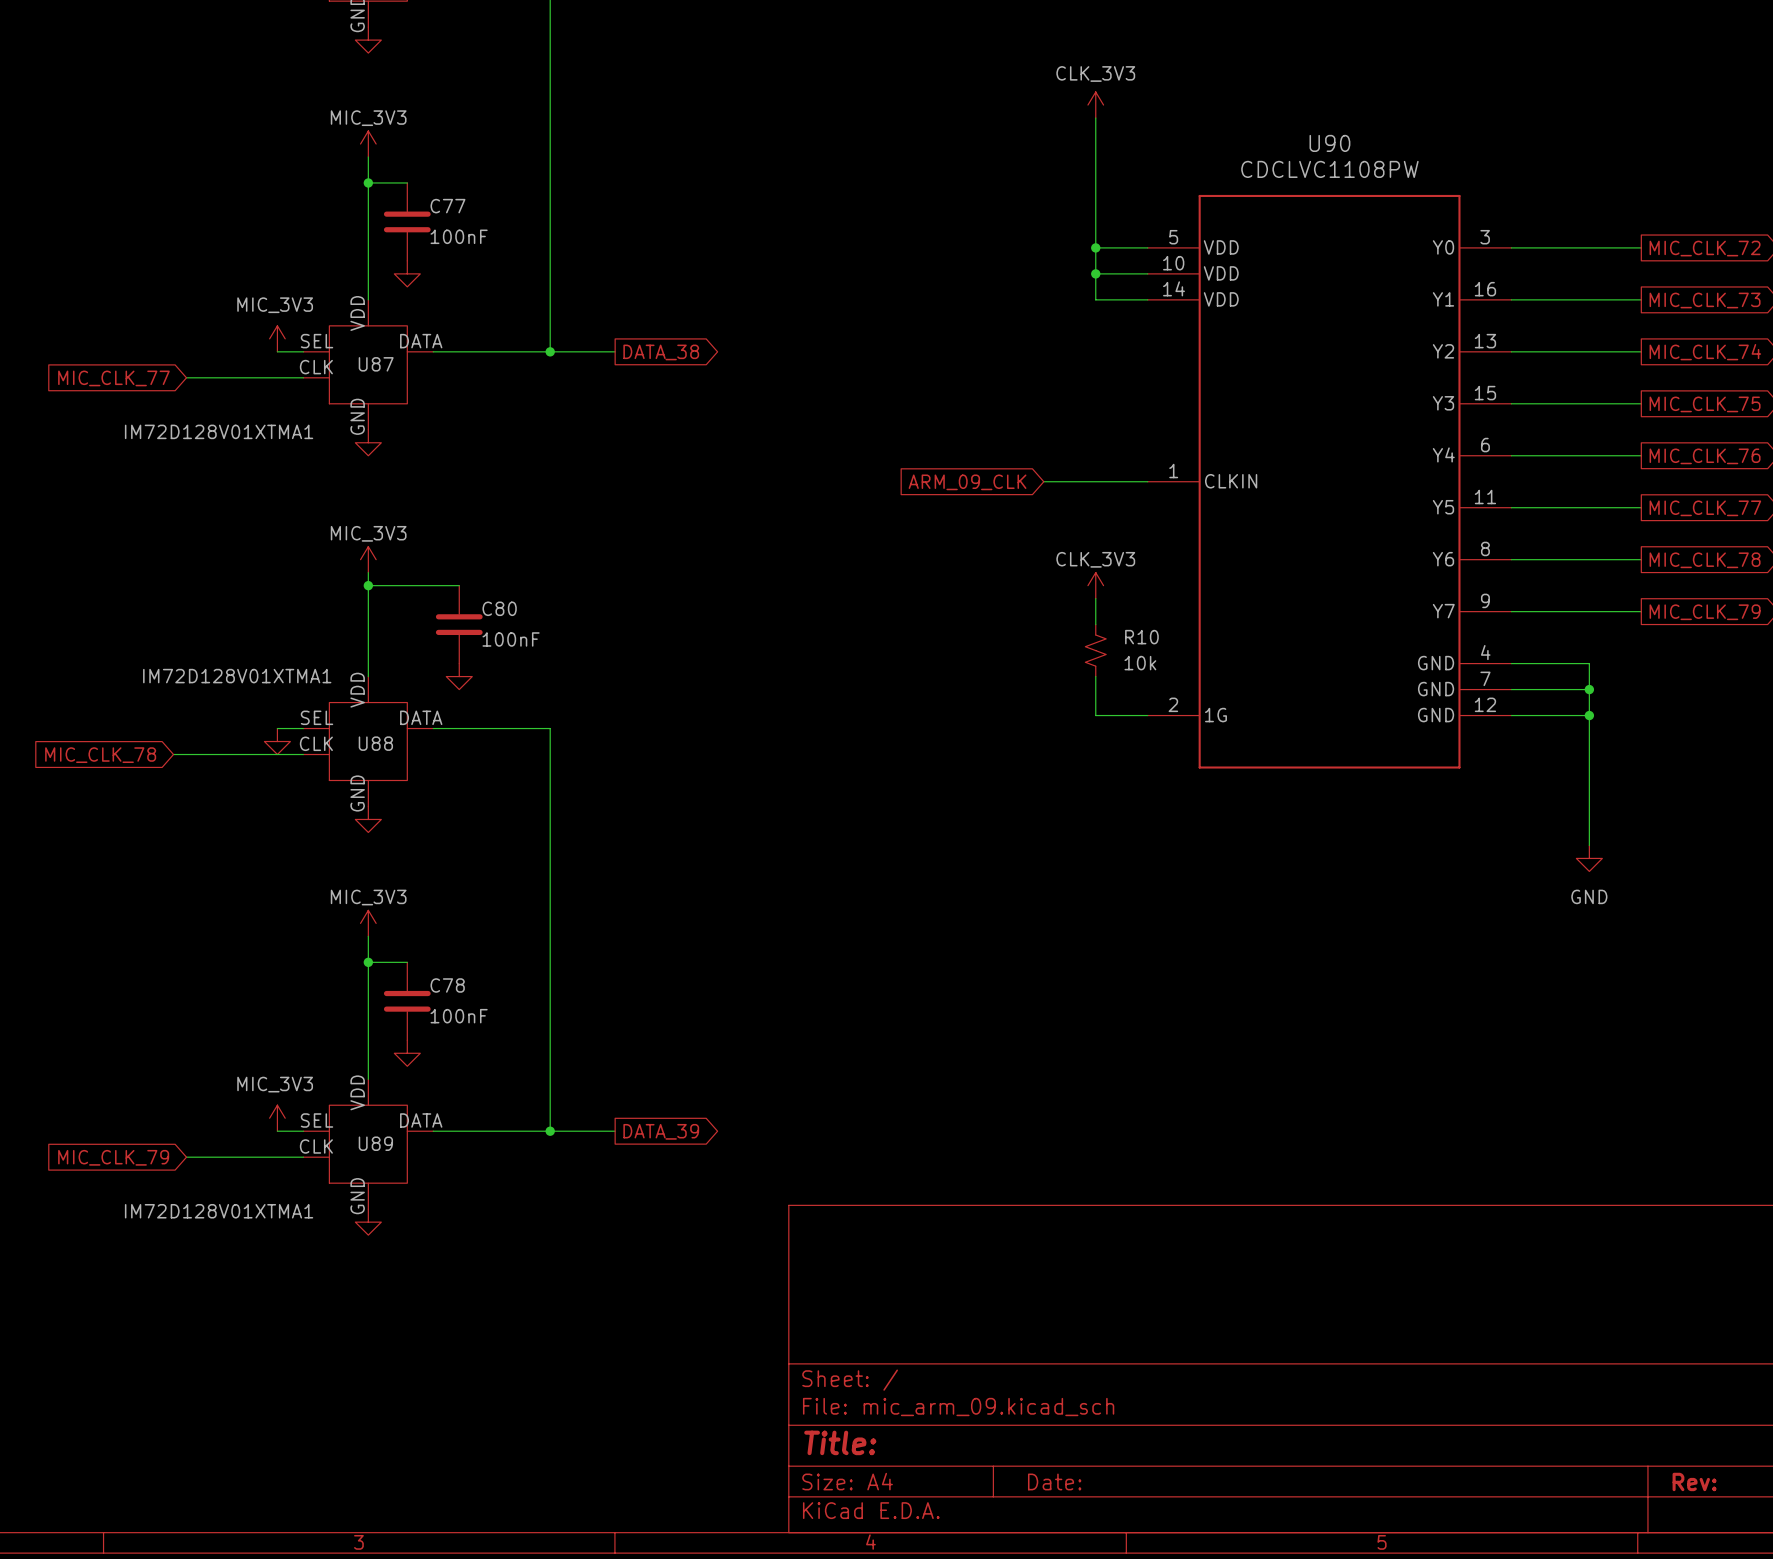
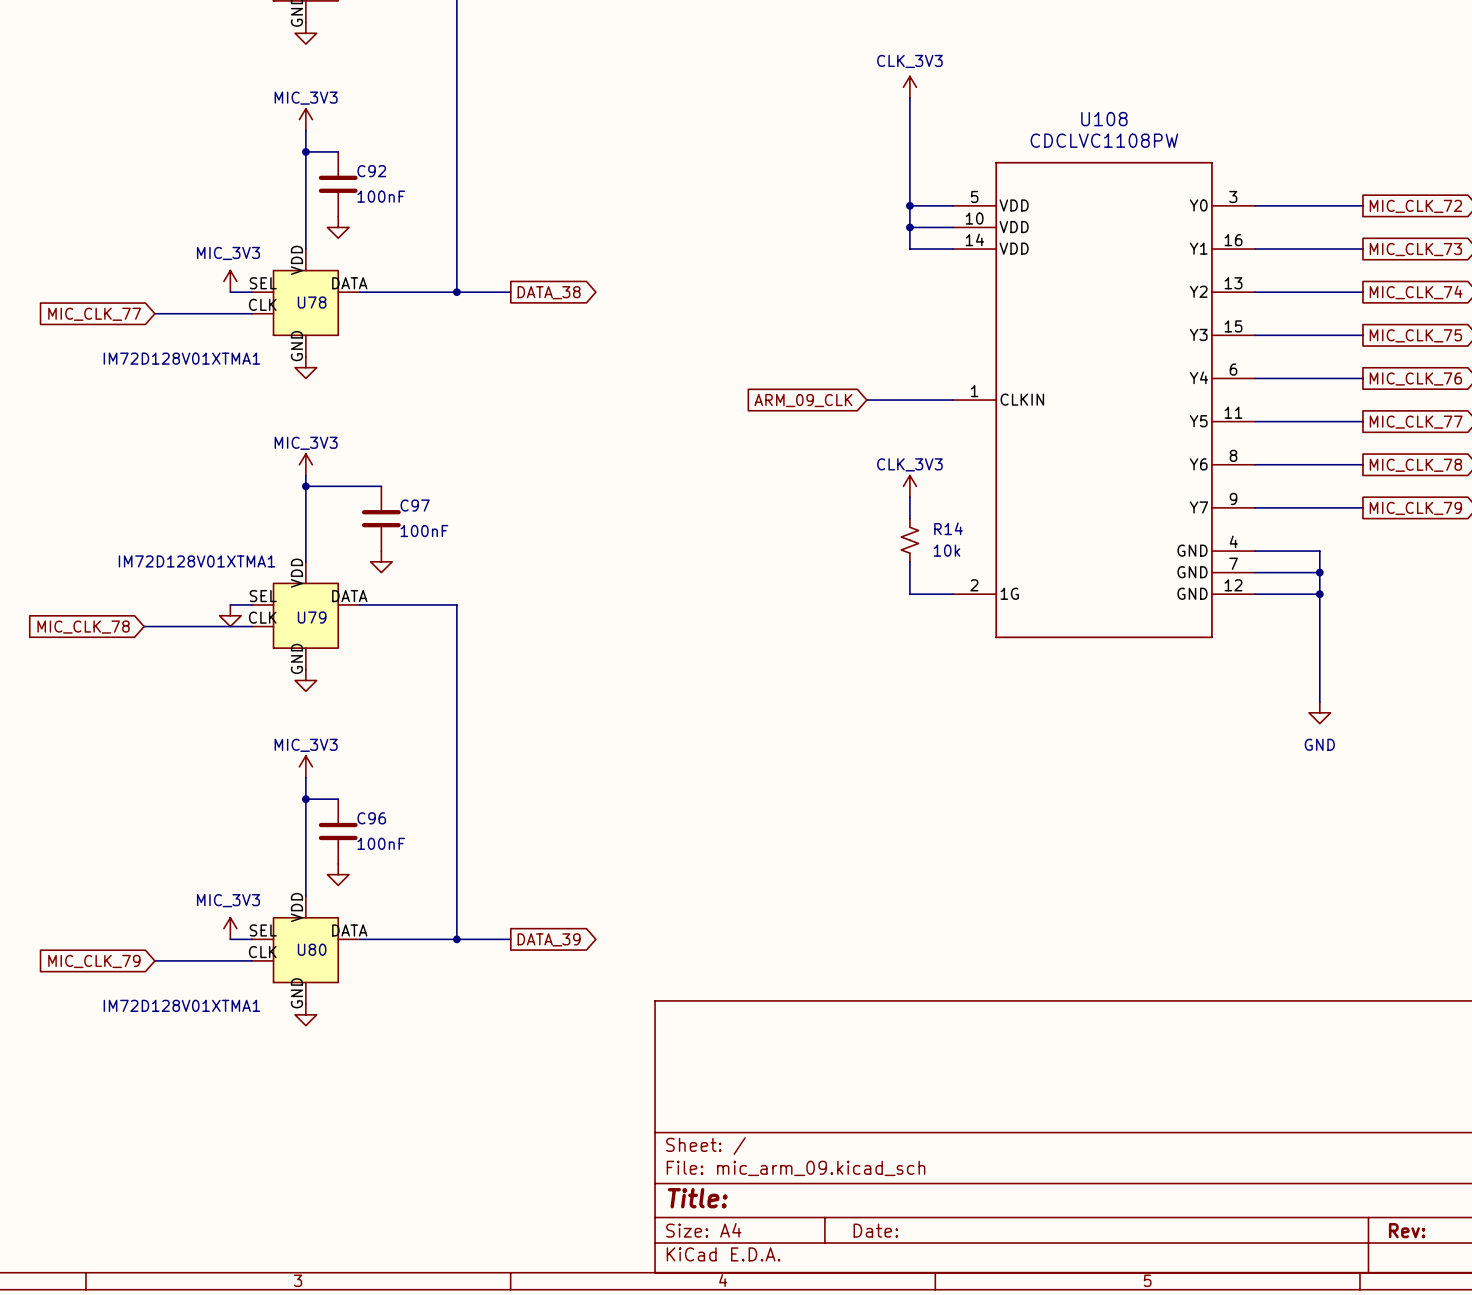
U90 name: U90 (1329, 143) -> U108 (1104, 119)
C77 name: C77 (447, 206) -> C92 (371, 171)
U87 name: U87 (376, 364) -> U78 (312, 302)
C80 name: C80 (499, 608) -> C97 (415, 505)
R10 name: R10 (1141, 637) -> R14 (948, 528)
U88 name: U88 (375, 743) -> U79 (312, 617)
C78 name: C78 (447, 985) -> C96 (371, 818)
U89 name: U89 (375, 1143) -> U80 (312, 949)

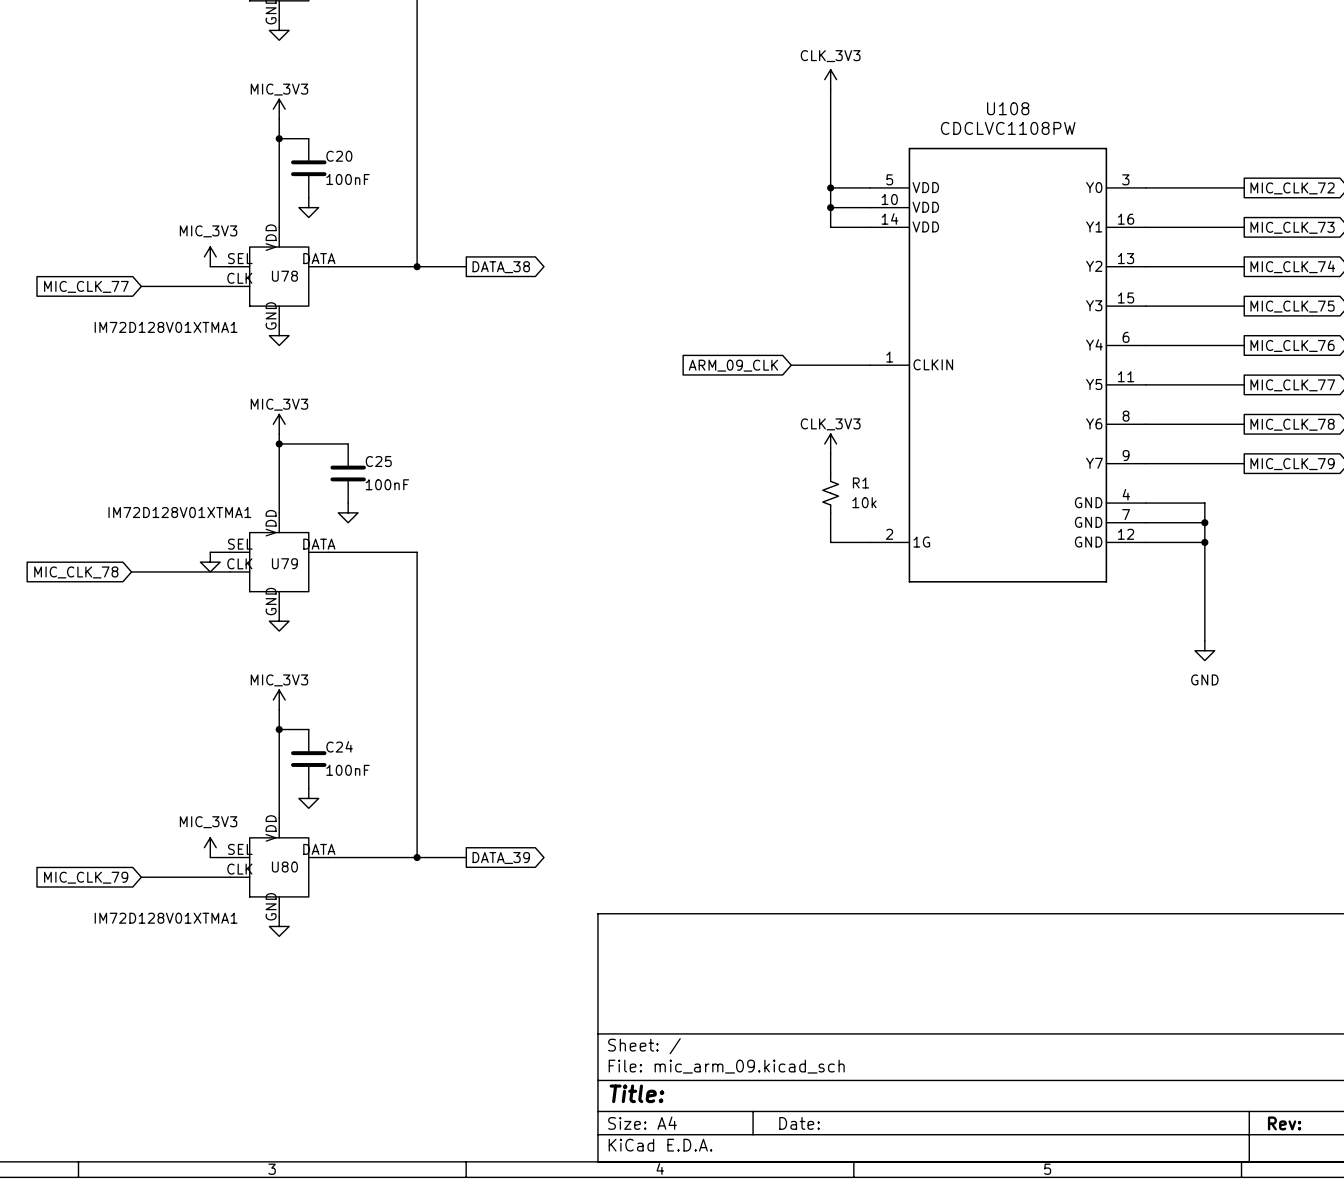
C92 name: C92 (371, 171) -> C20 (339, 156)
C97 name: C97 (415, 505) -> C25 (378, 461)
R14 name: R14 (948, 528) -> R1 (860, 482)
C96 name: C96 (371, 818) -> C24 (339, 746)

